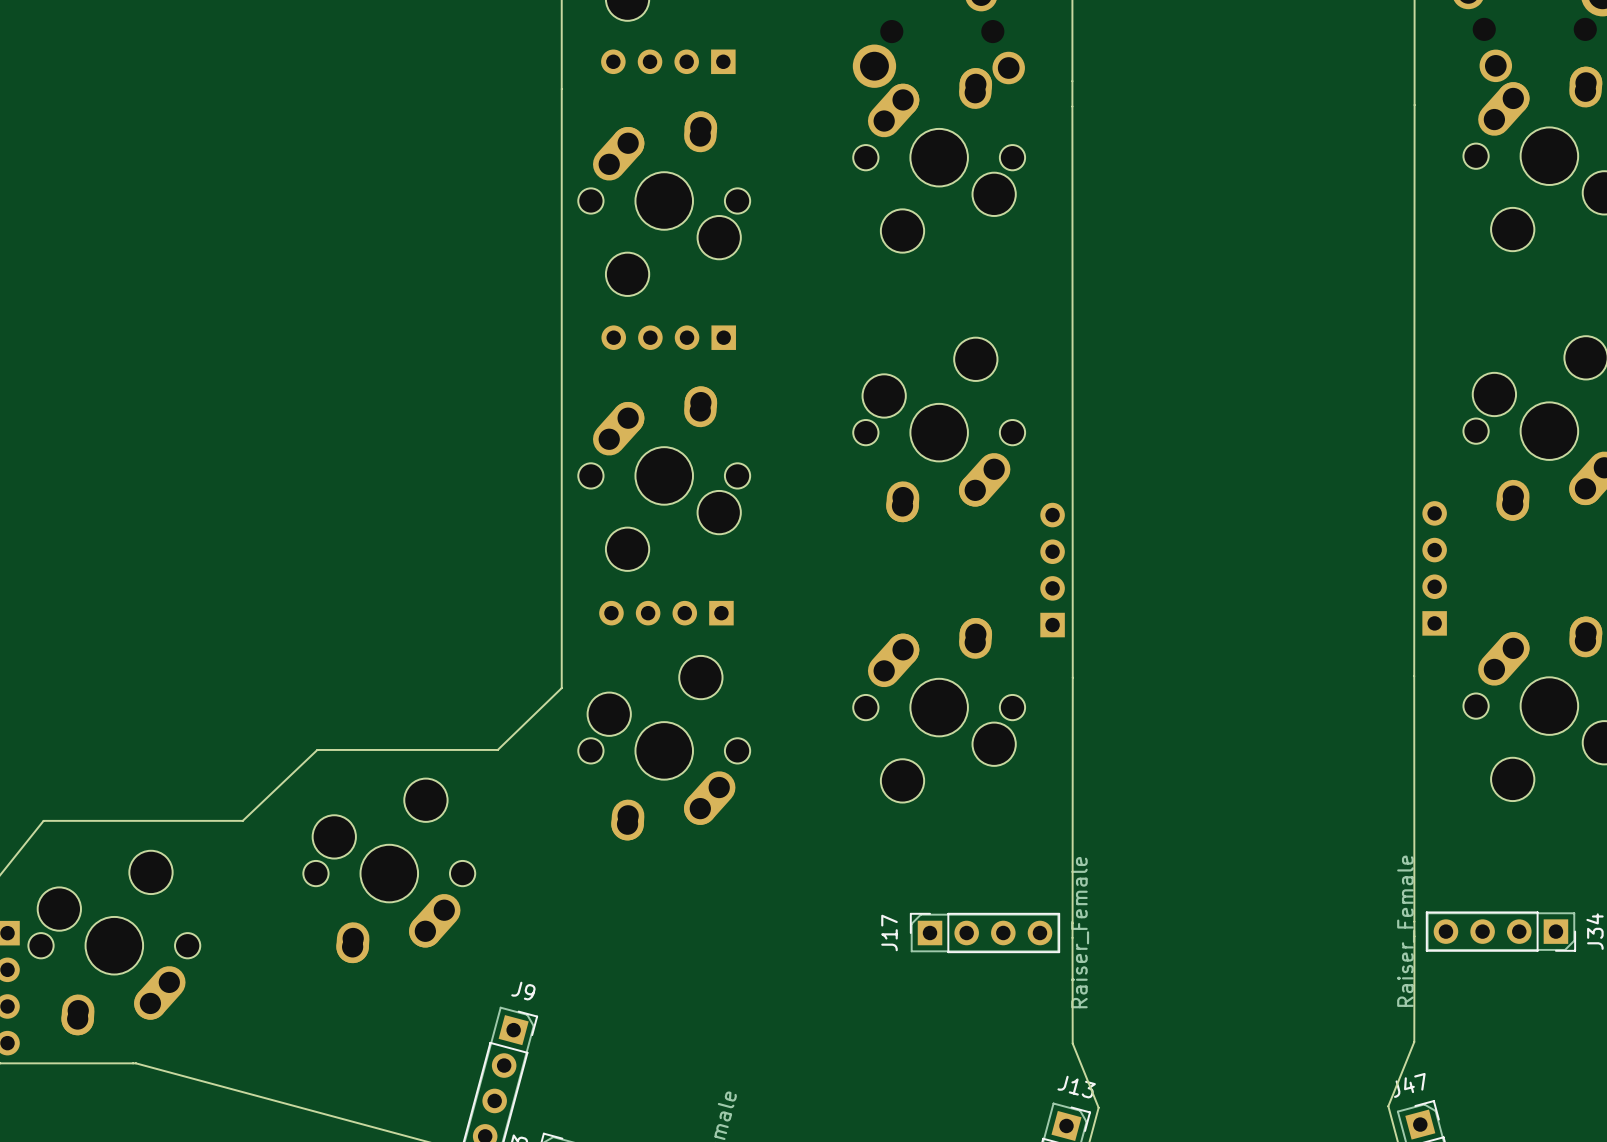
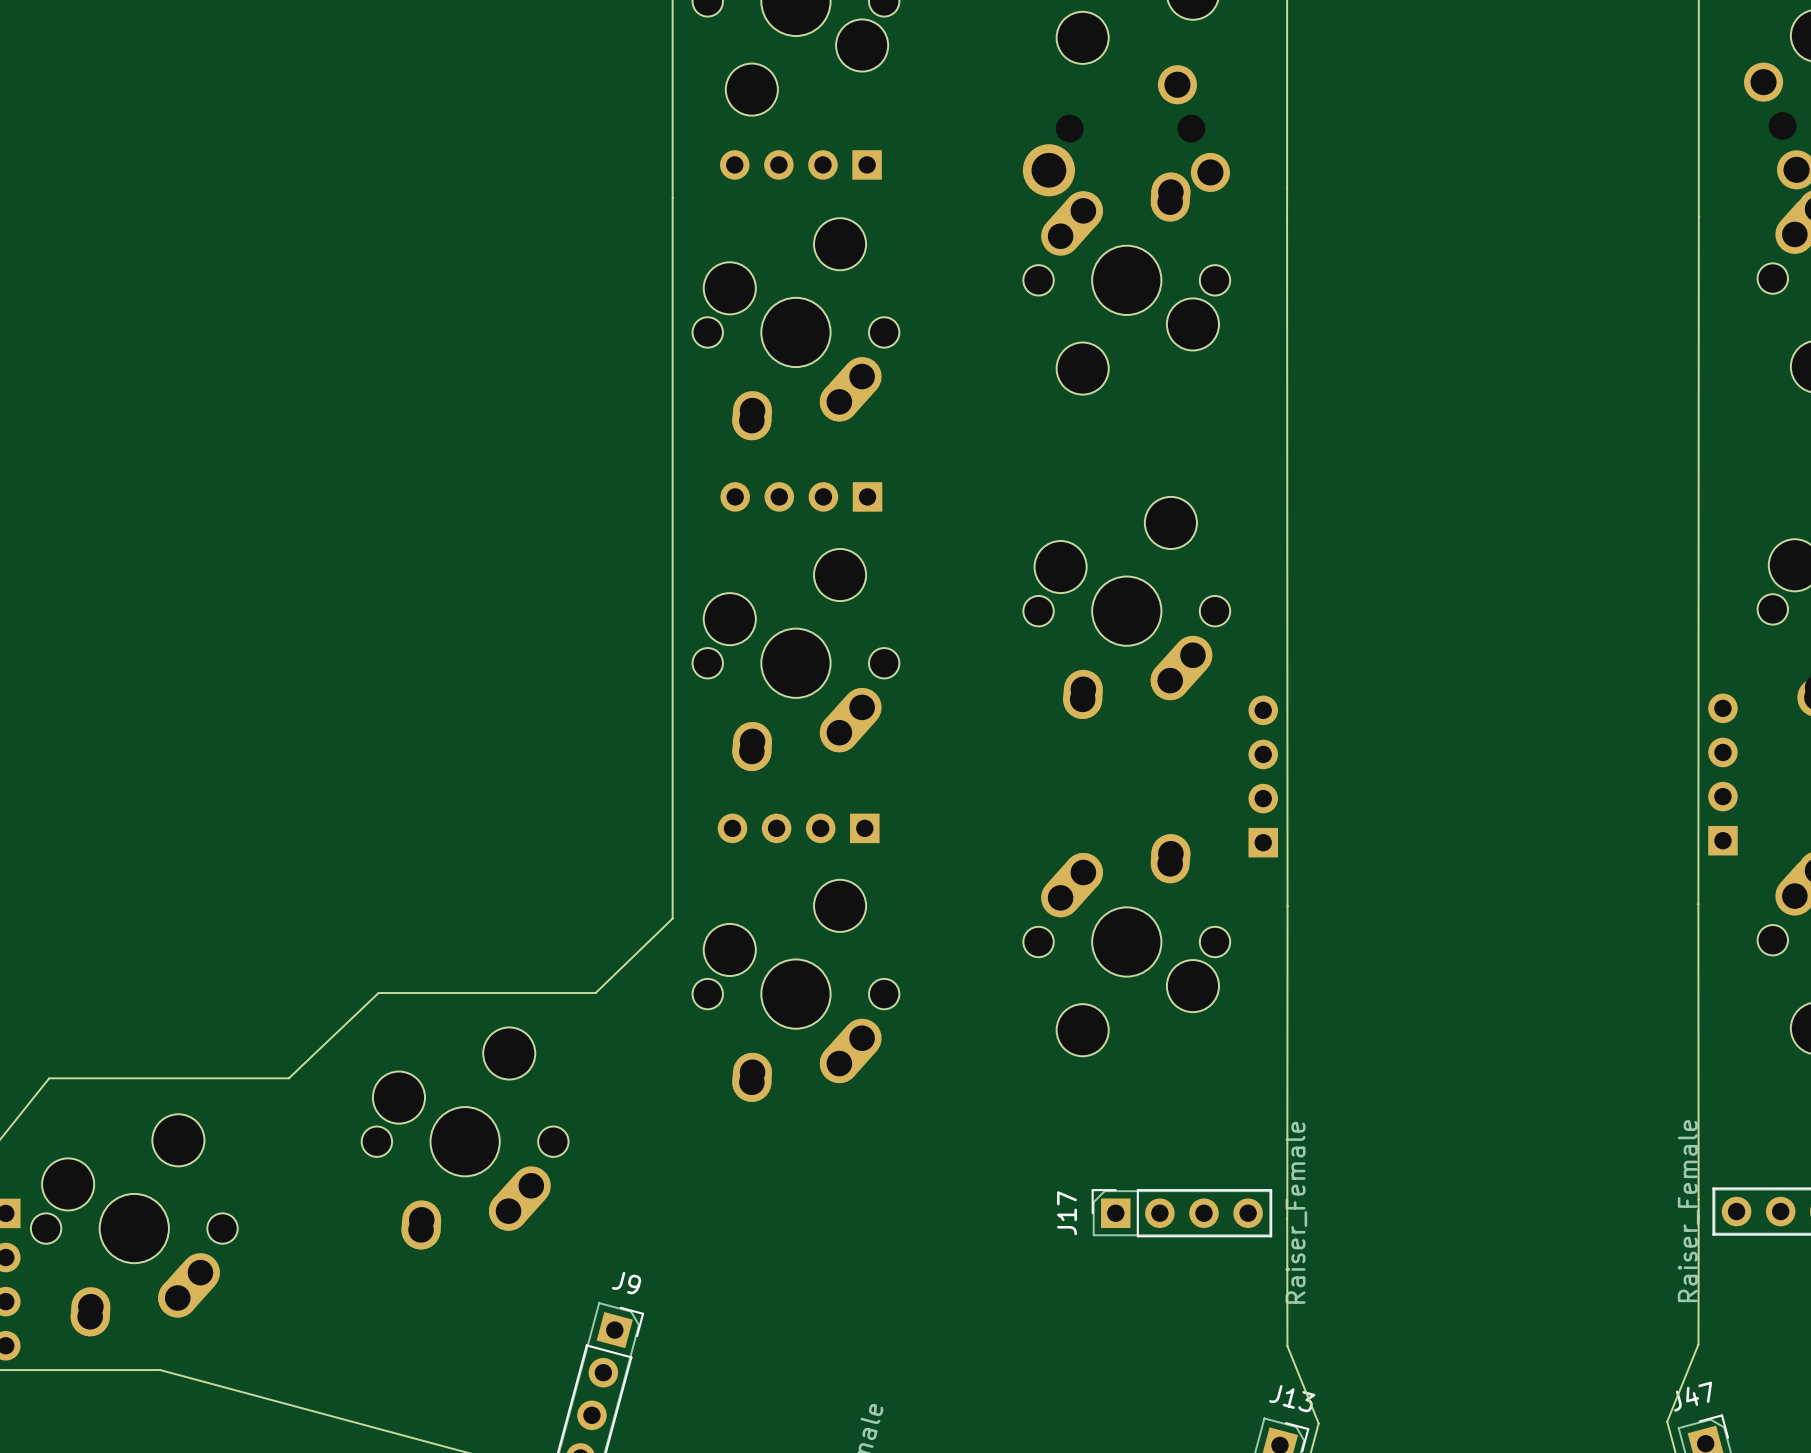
part rotation: 0° (664, 203) -> 180° (795, 329)
part rotation: 0° (664, 478) -> 180° (795, 660)

